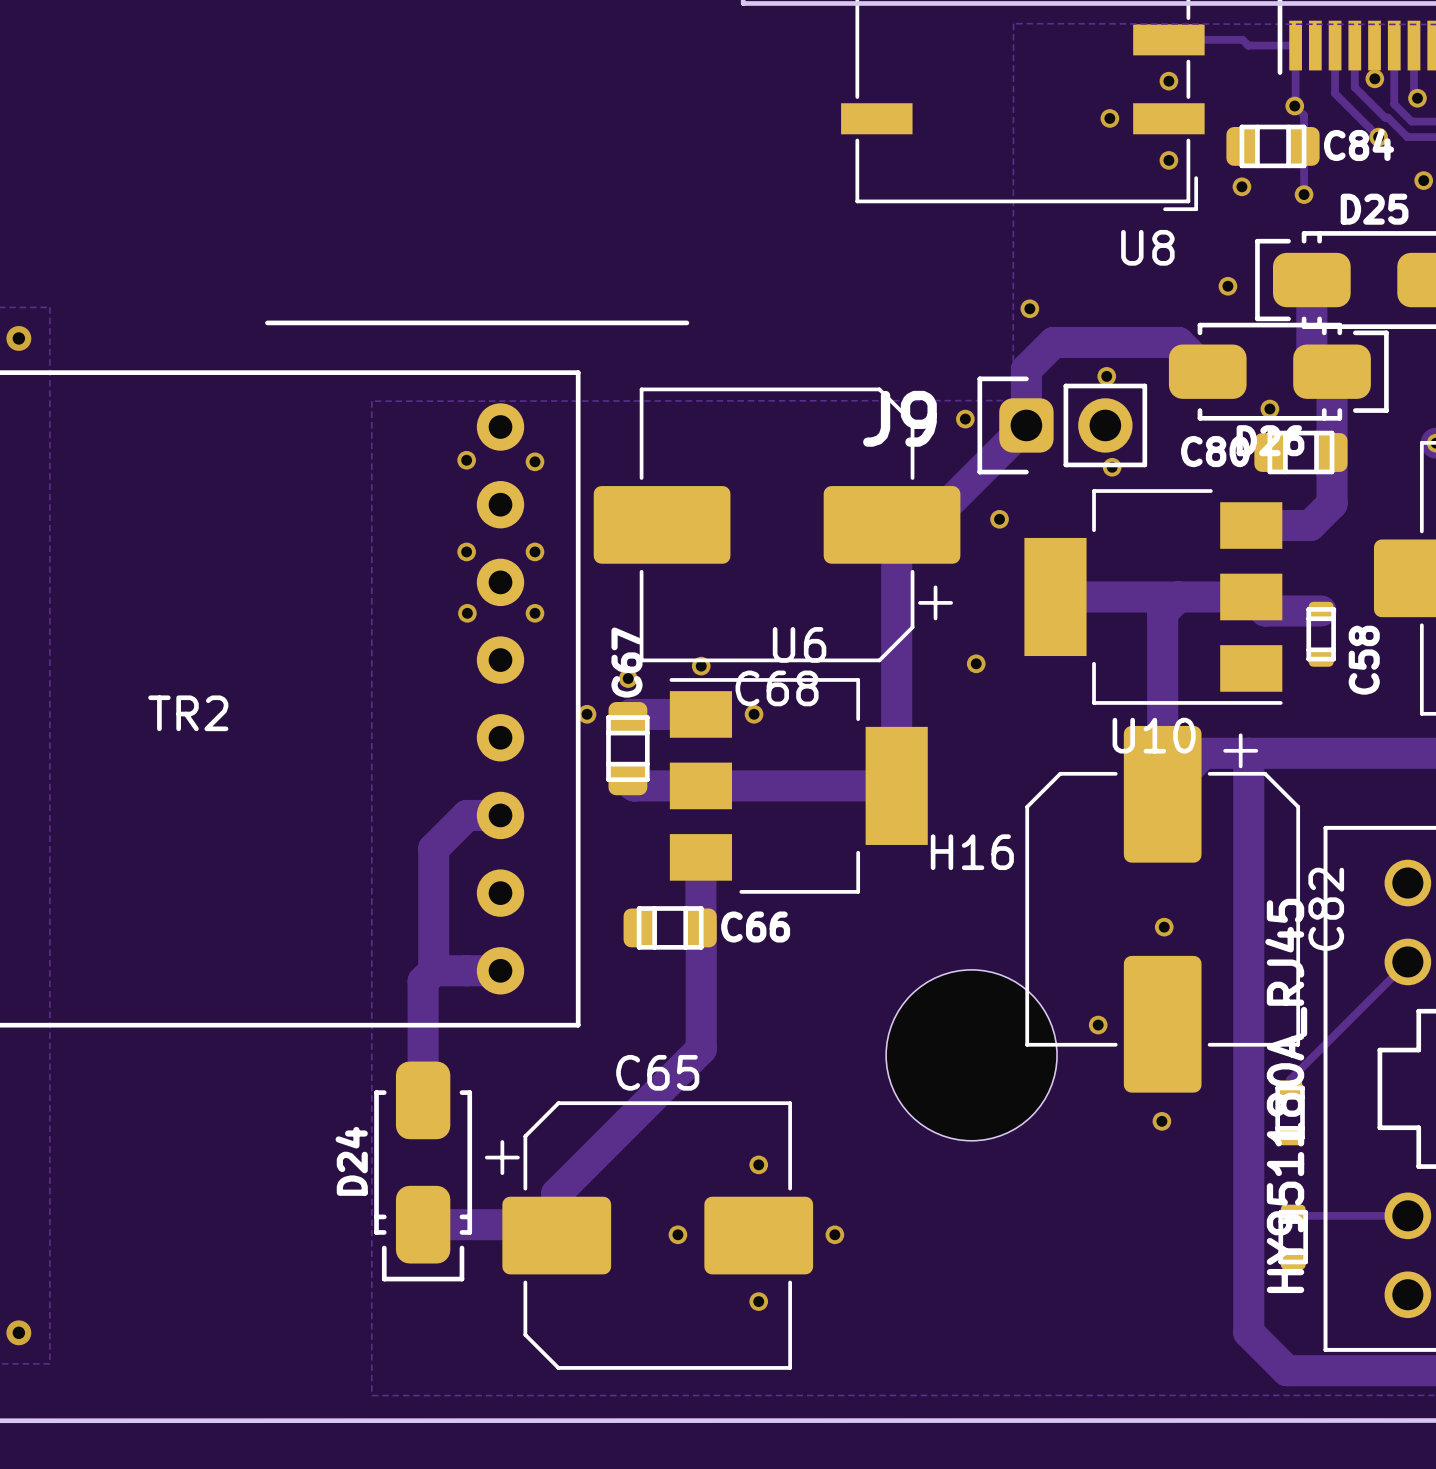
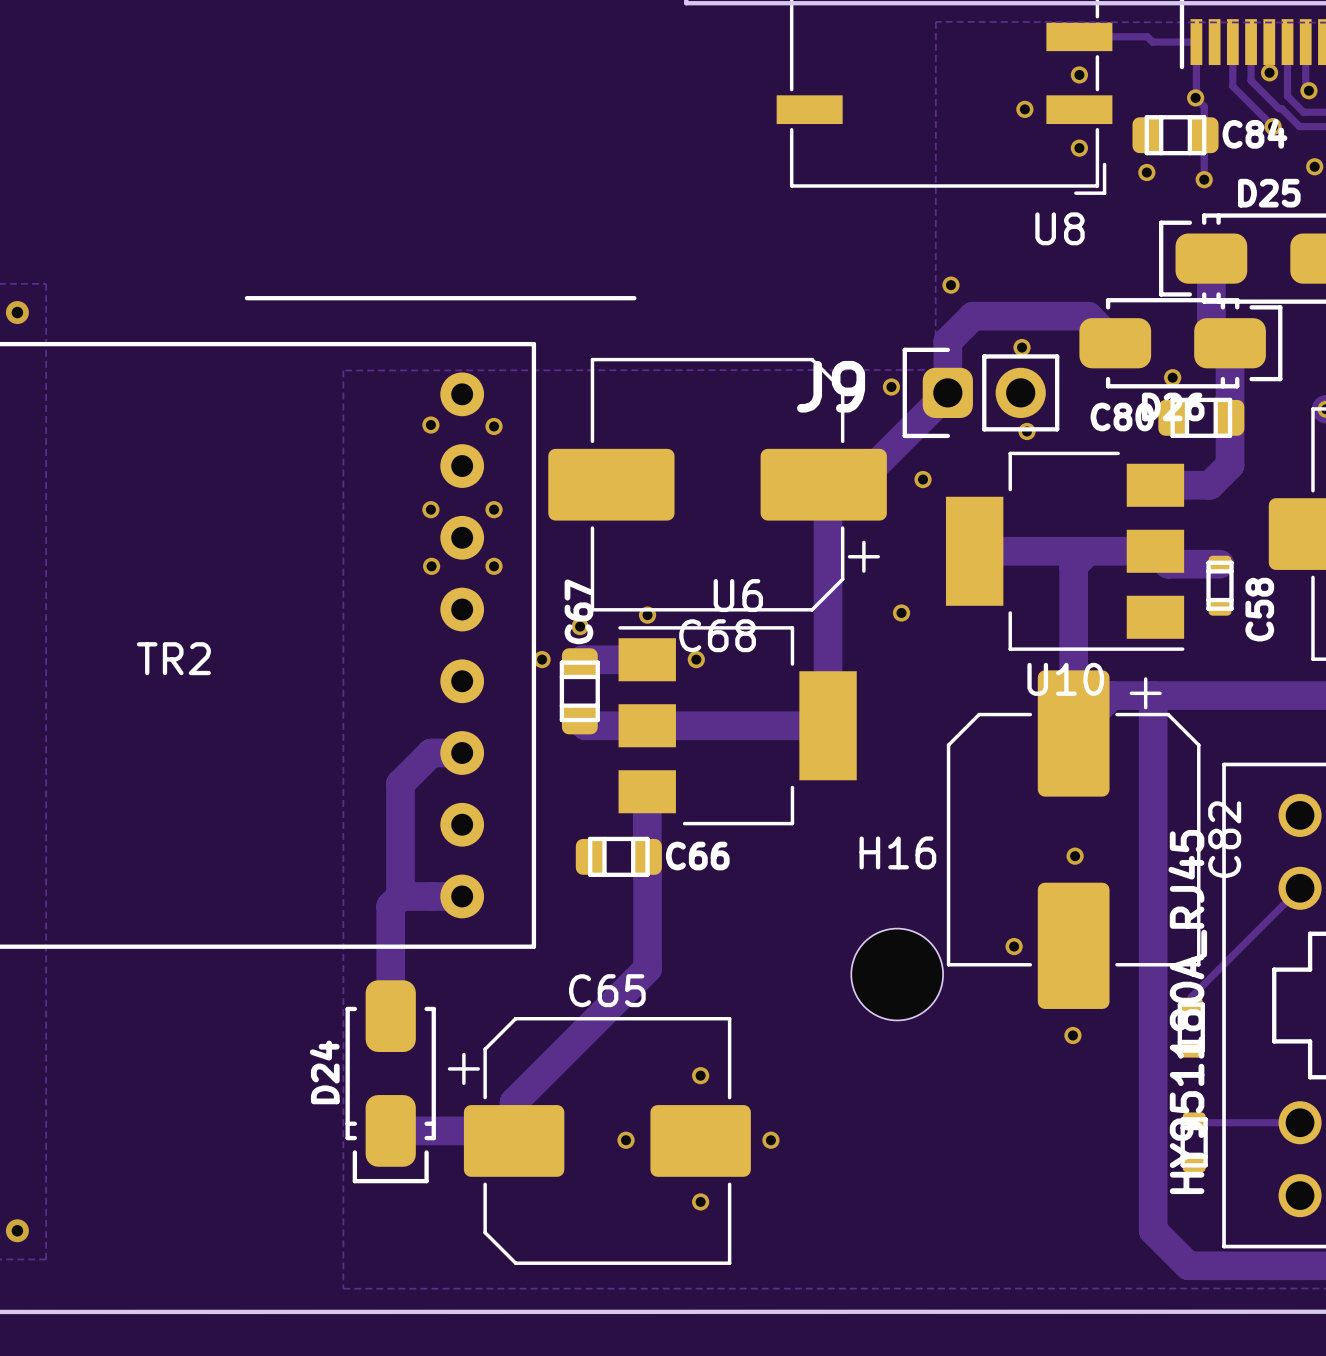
via: (1227, 286) -> none
H16 name position: H16 (972, 852) -> H16 (897, 852)
H16 footprint: [886, 969, 1058, 1141] -> [851, 928, 944, 1021]

